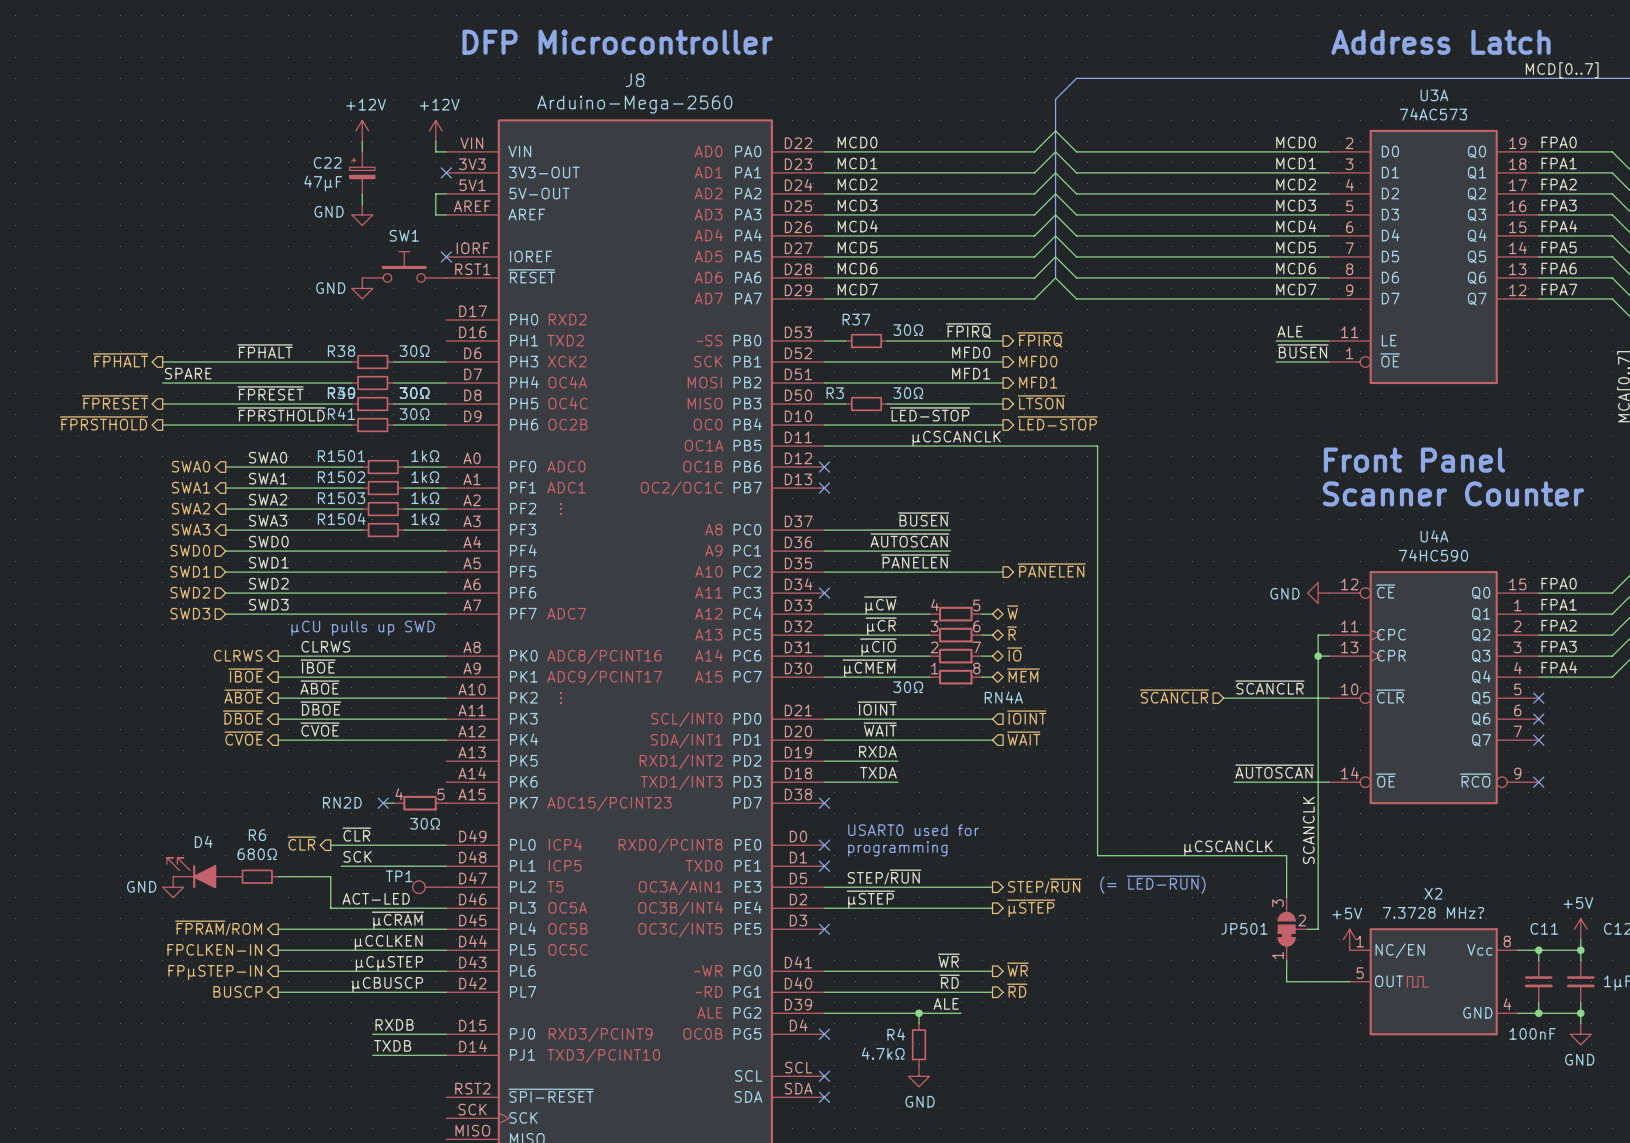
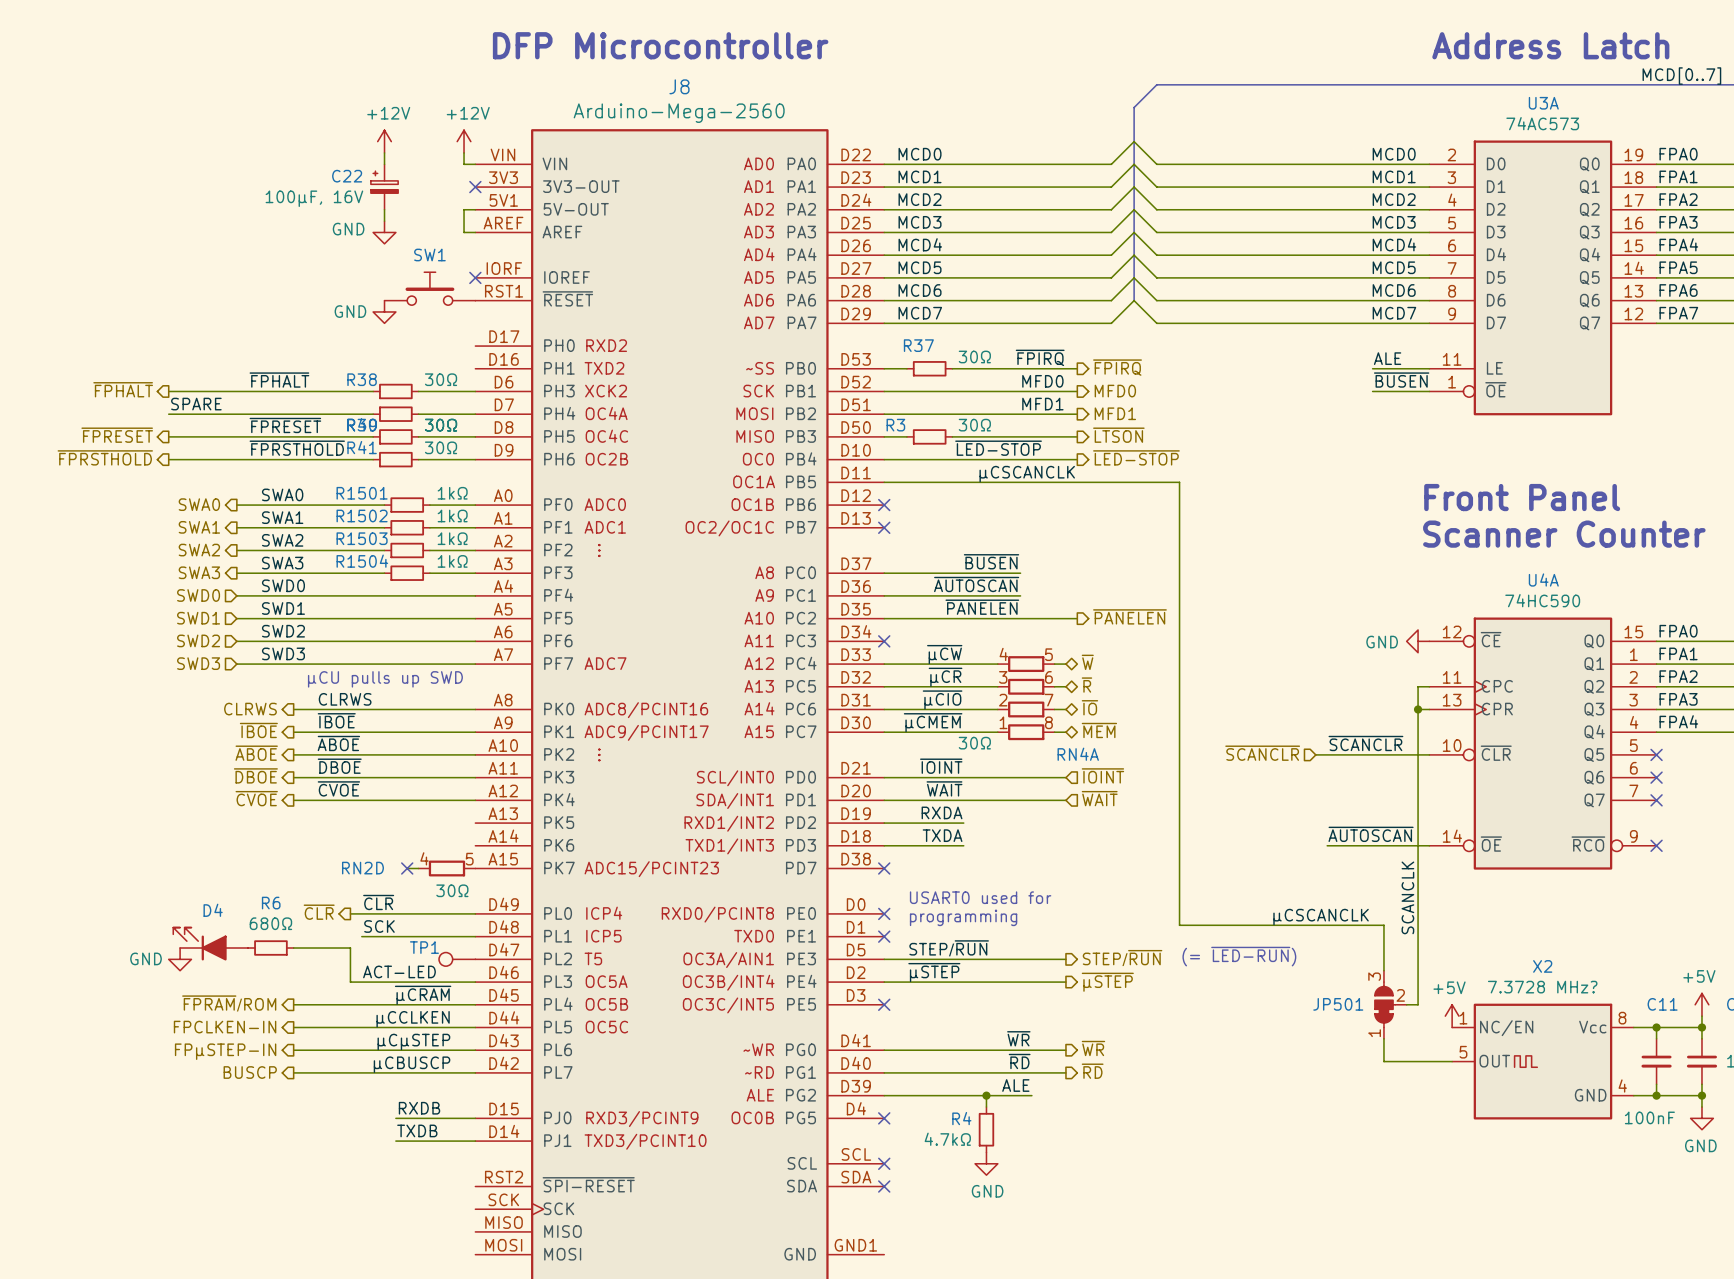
C22 value: 47µF (323, 183) -> 100µF, 16V (314, 198)

